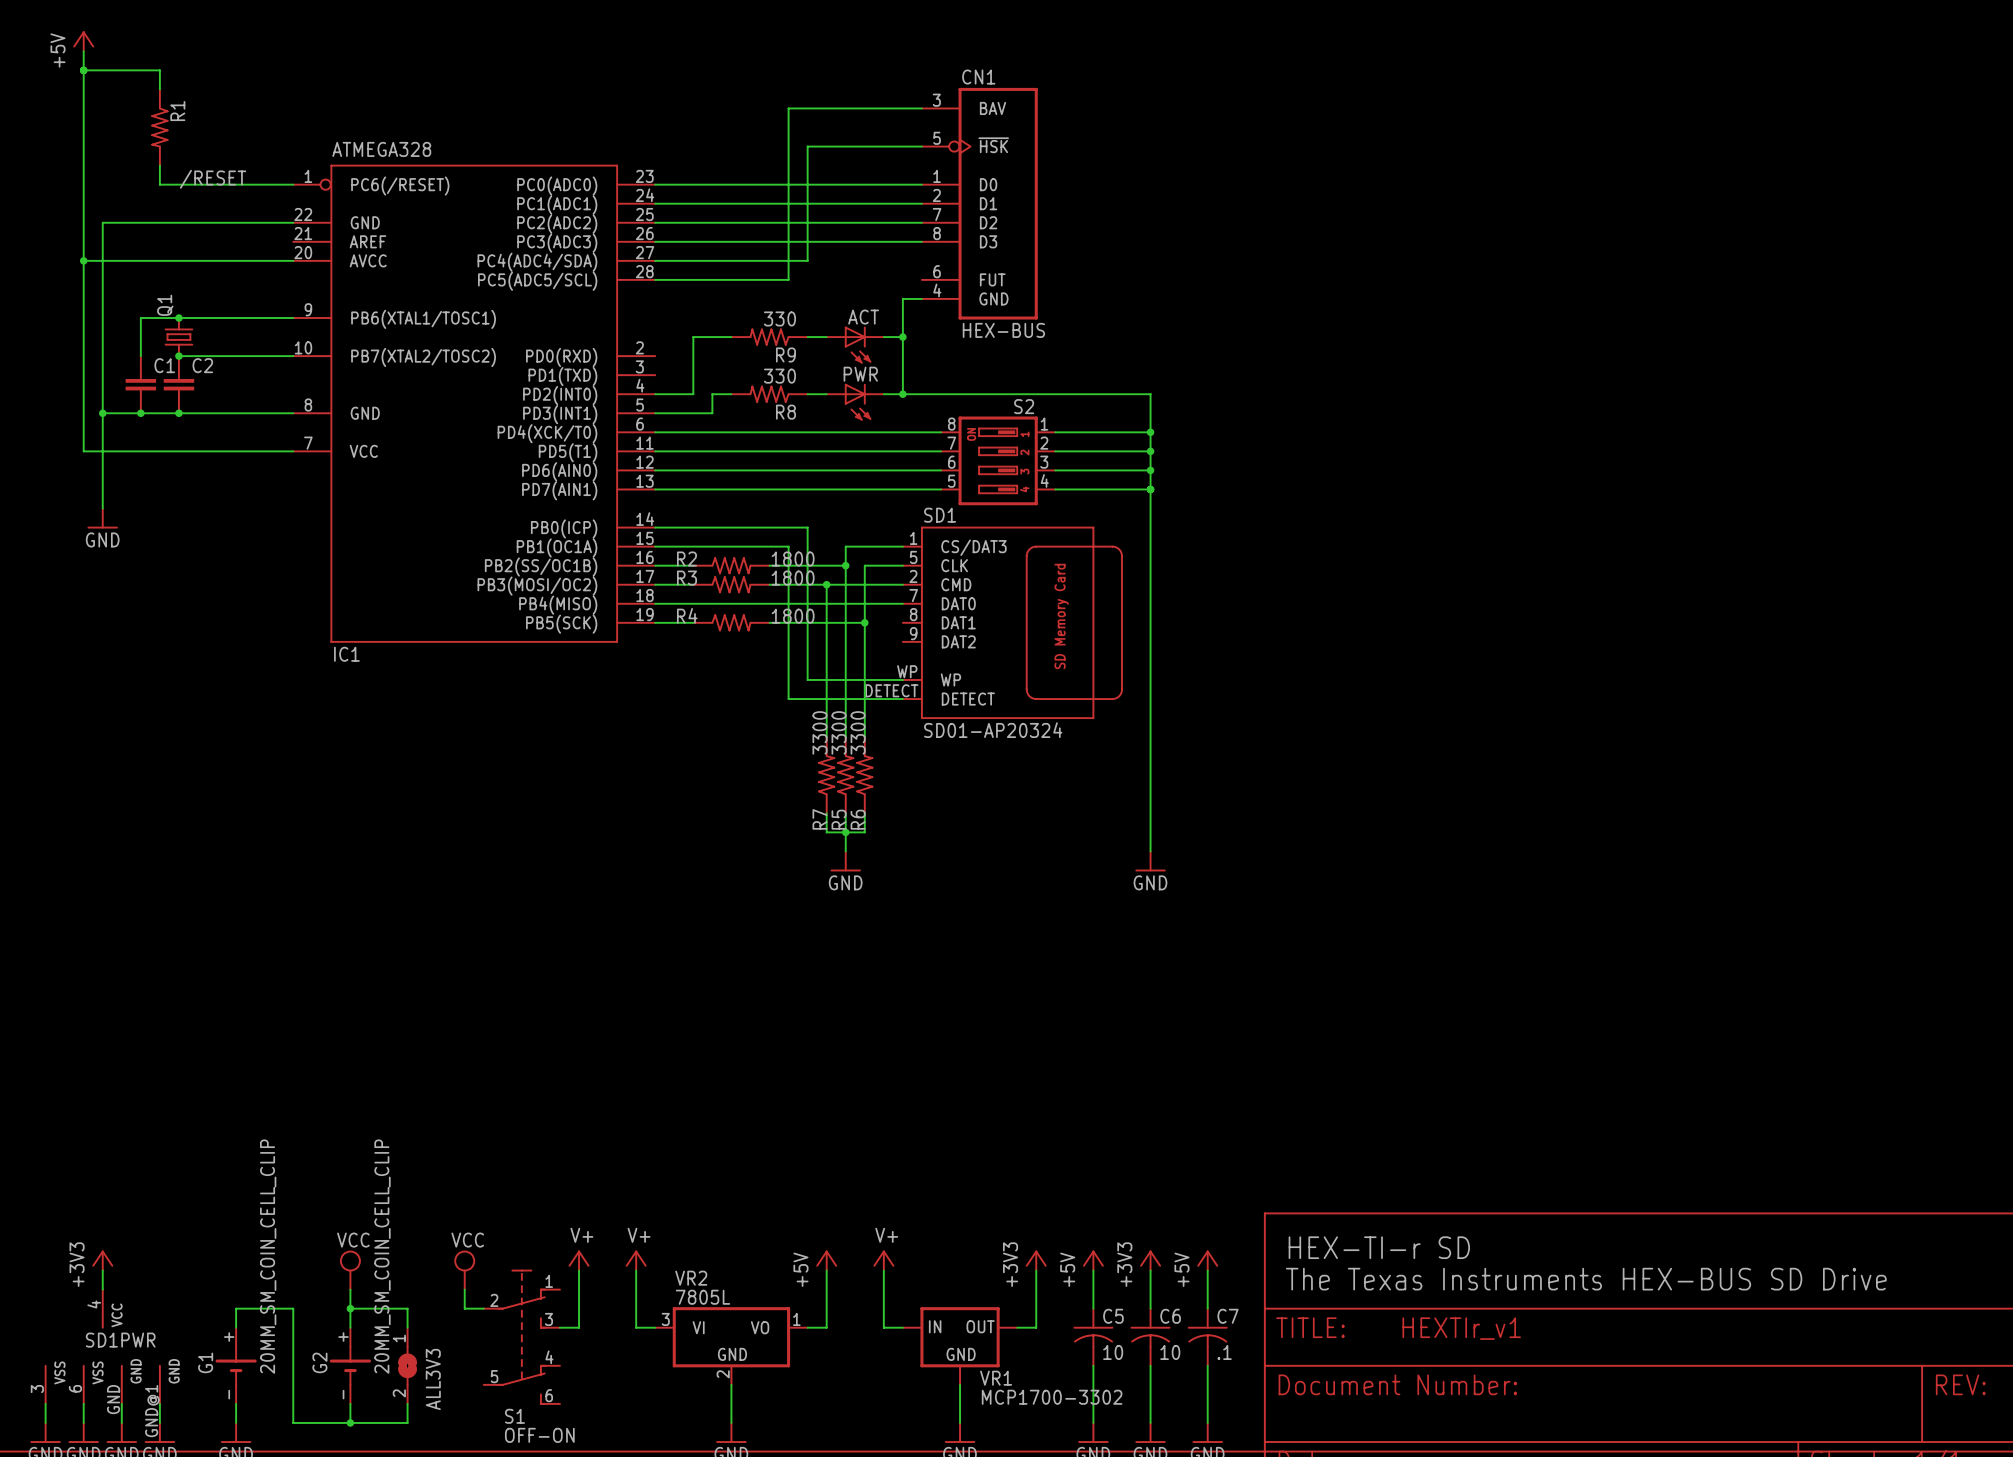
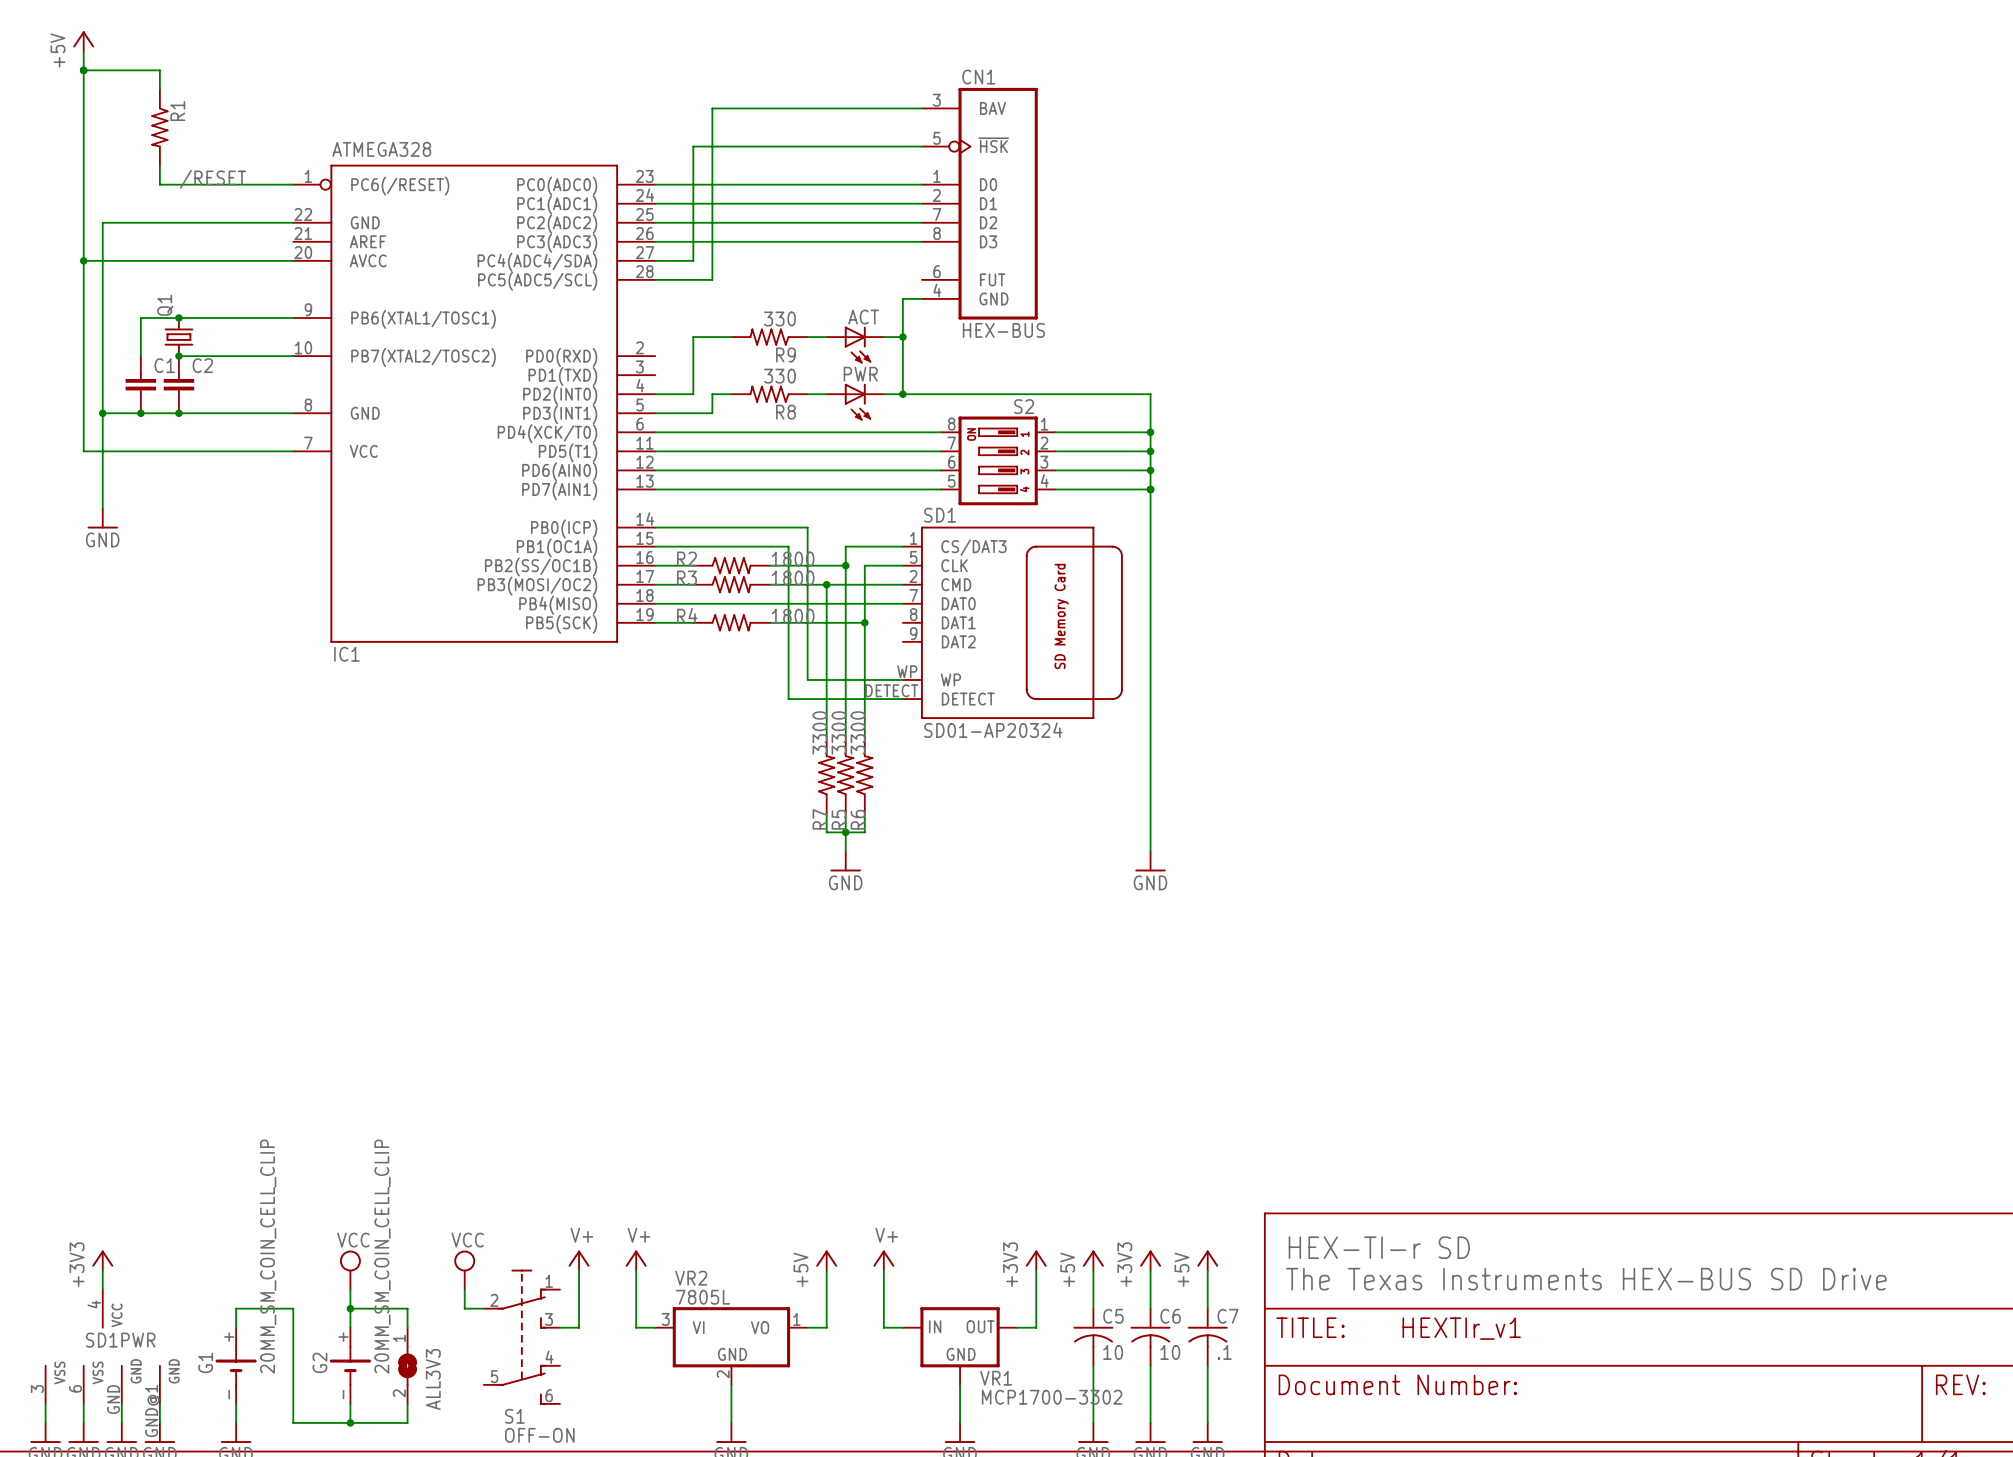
wire: (788, 108) (788, 279) (712, 279) -> (788, 108) (712, 108) (712, 279)
wire: (807, 146) (807, 260) (693, 260) -> (807, 146) (693, 146) (693, 260)

